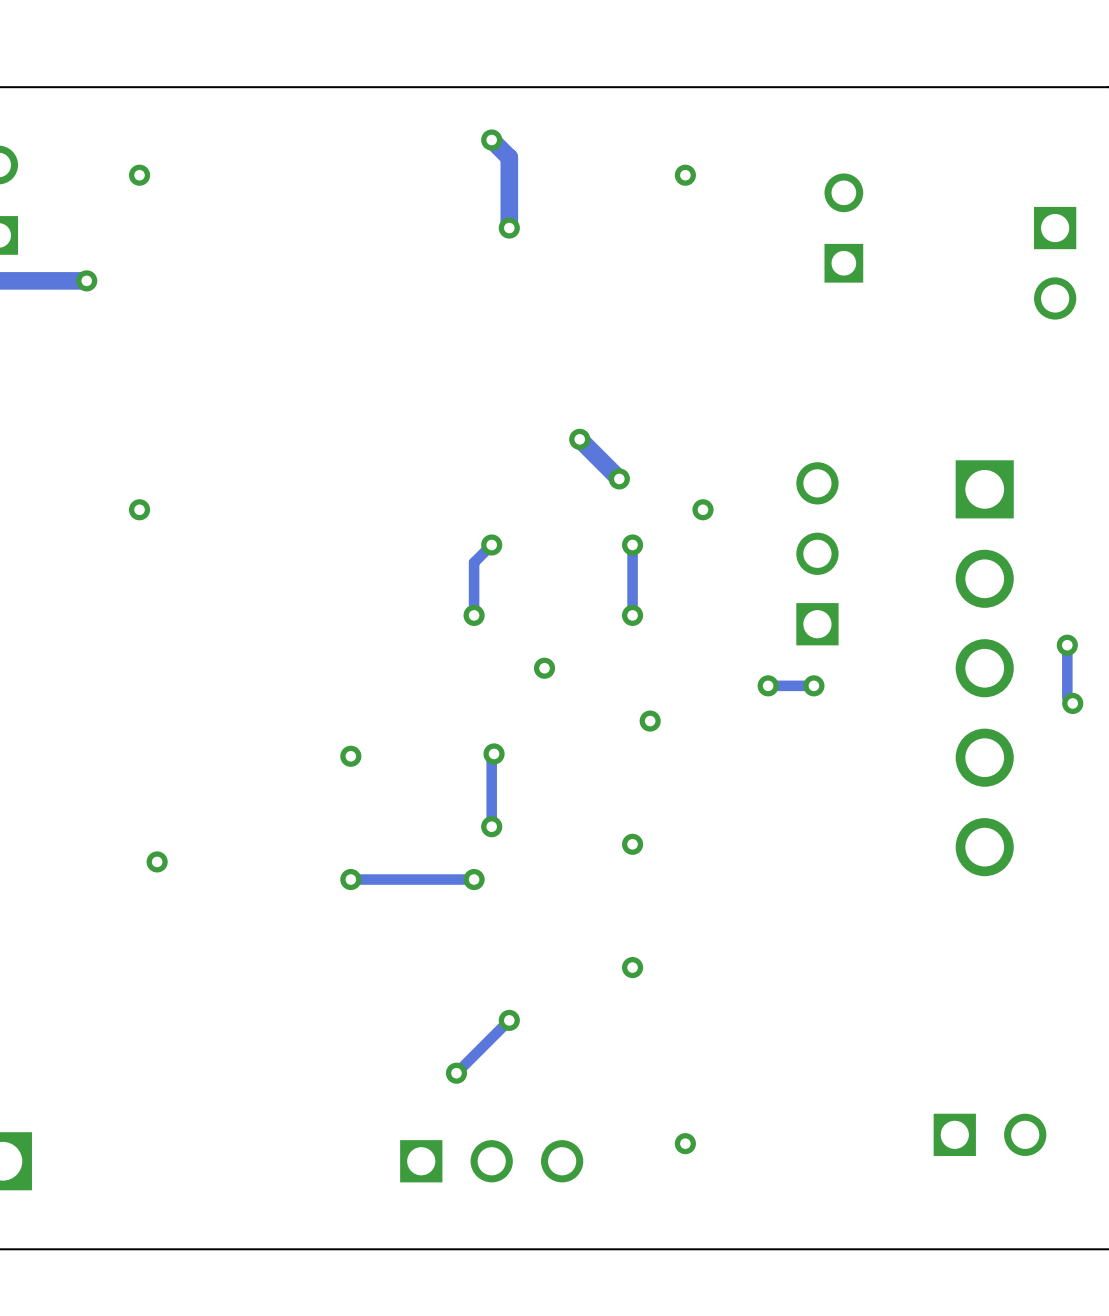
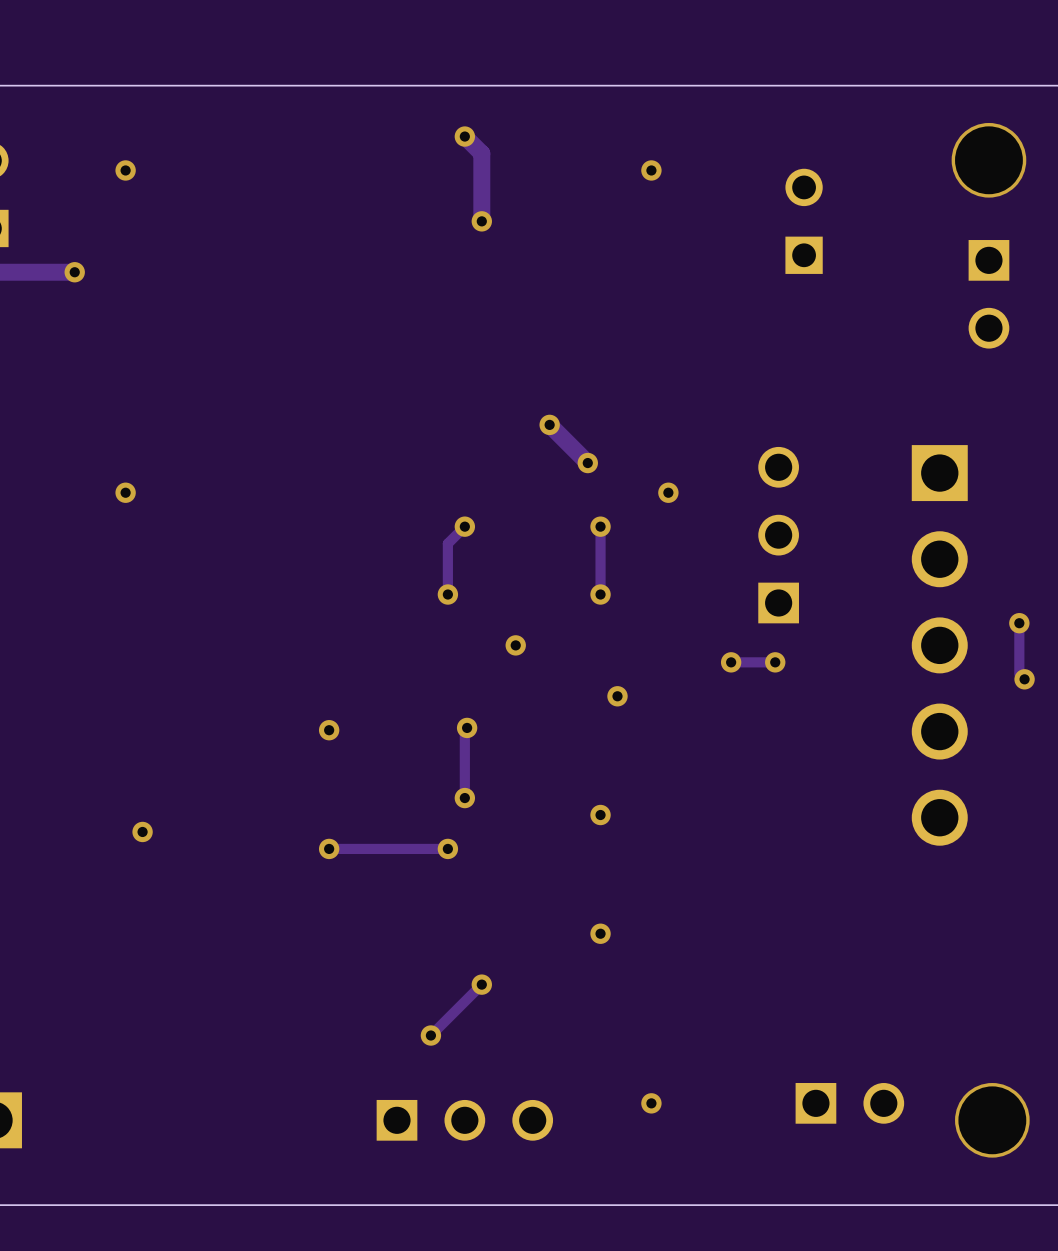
via: none -> (988, 160)
part position: (1055, 263) -> (988, 294)
part position: (990, 1134) -> (849, 1103)
via: none -> (992, 1120)

